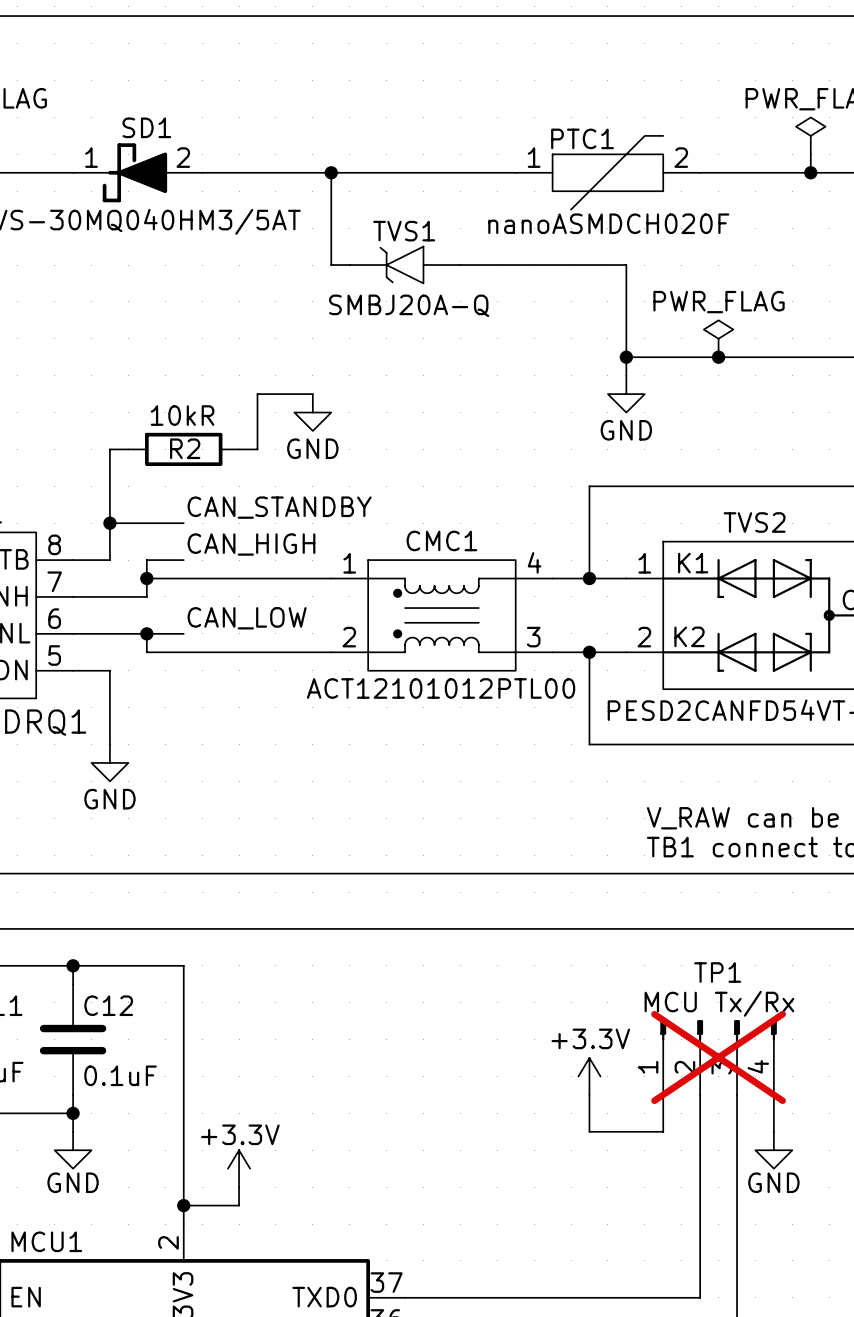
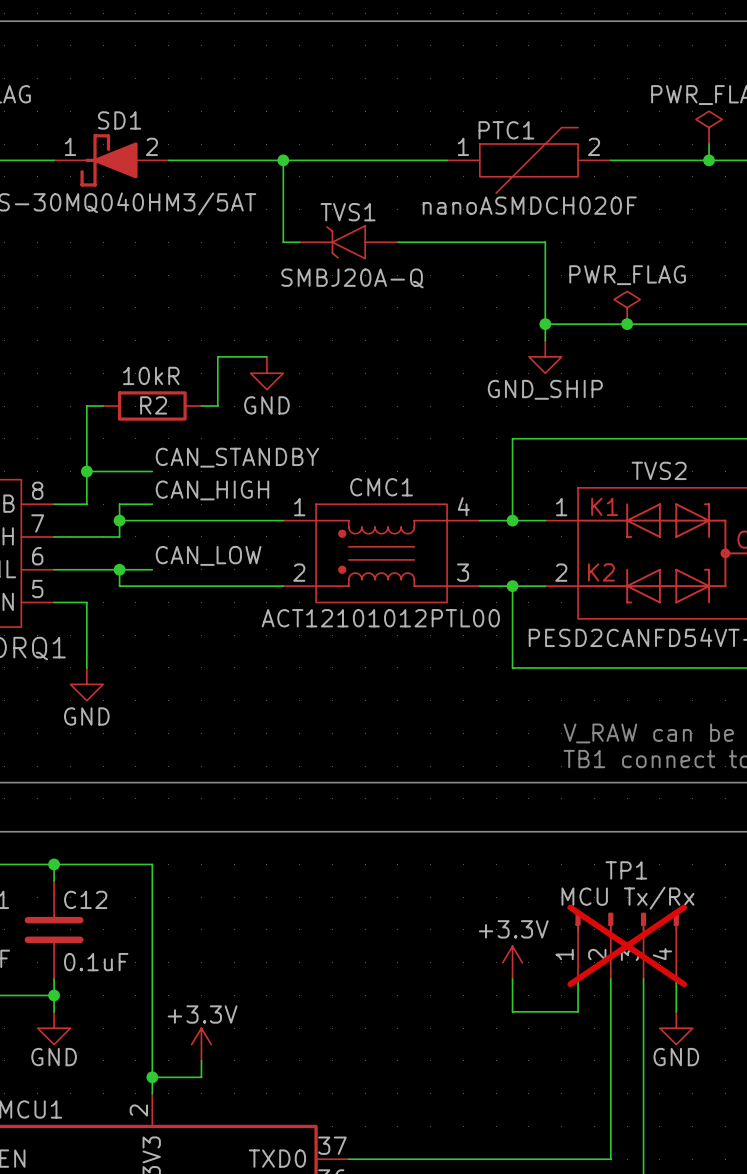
power symbol: GND (626, 394) -> GND_SHIP (545, 356)

